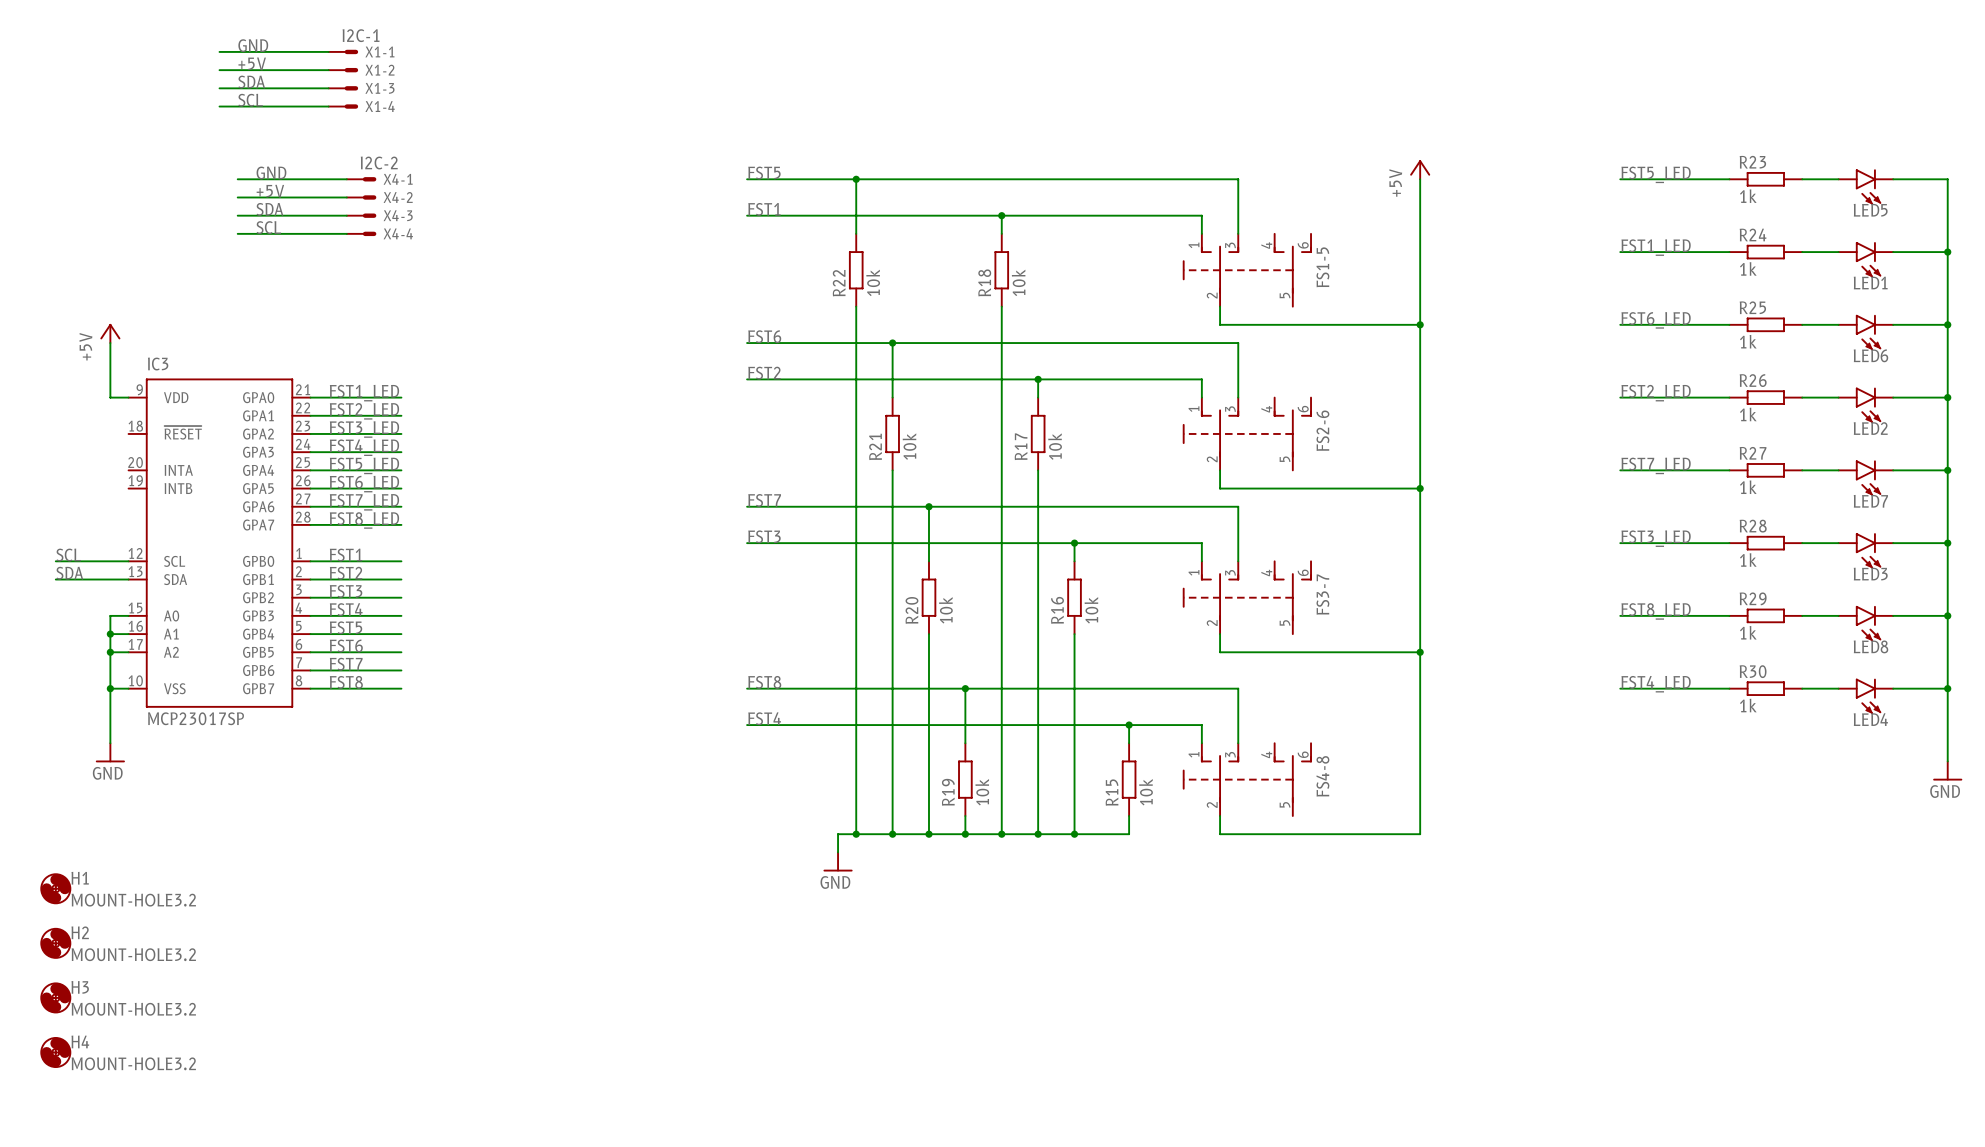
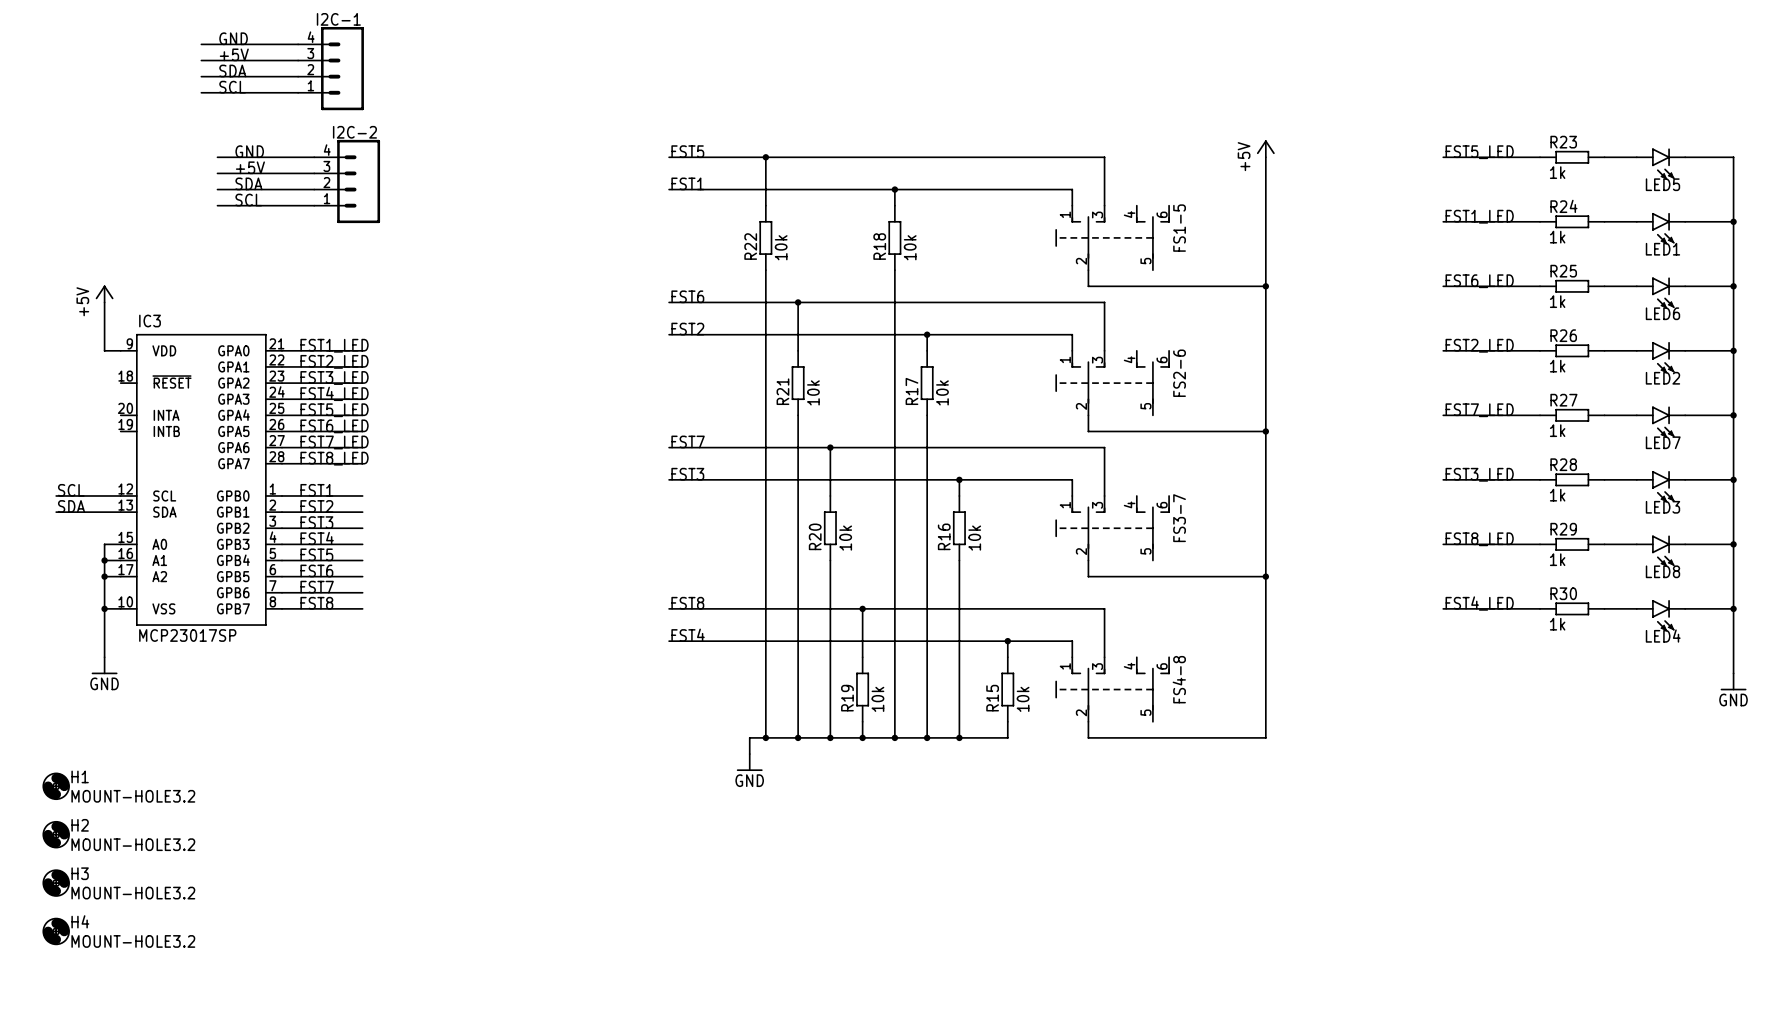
X1-1: I2C-1 (343, 51) -> none
X1-2: (343, 70) -> none
I2C-1: none -> (331, 68)
X1-3: (343, 88) -> none
X1-4: (343, 106) -> none
X4-1: I2C-2 (361, 179) -> none
X4-2: (361, 197) -> none
I2C-2: none -> (347, 181)
X4-3: (361, 215) -> none
X4-4: (361, 233) -> none

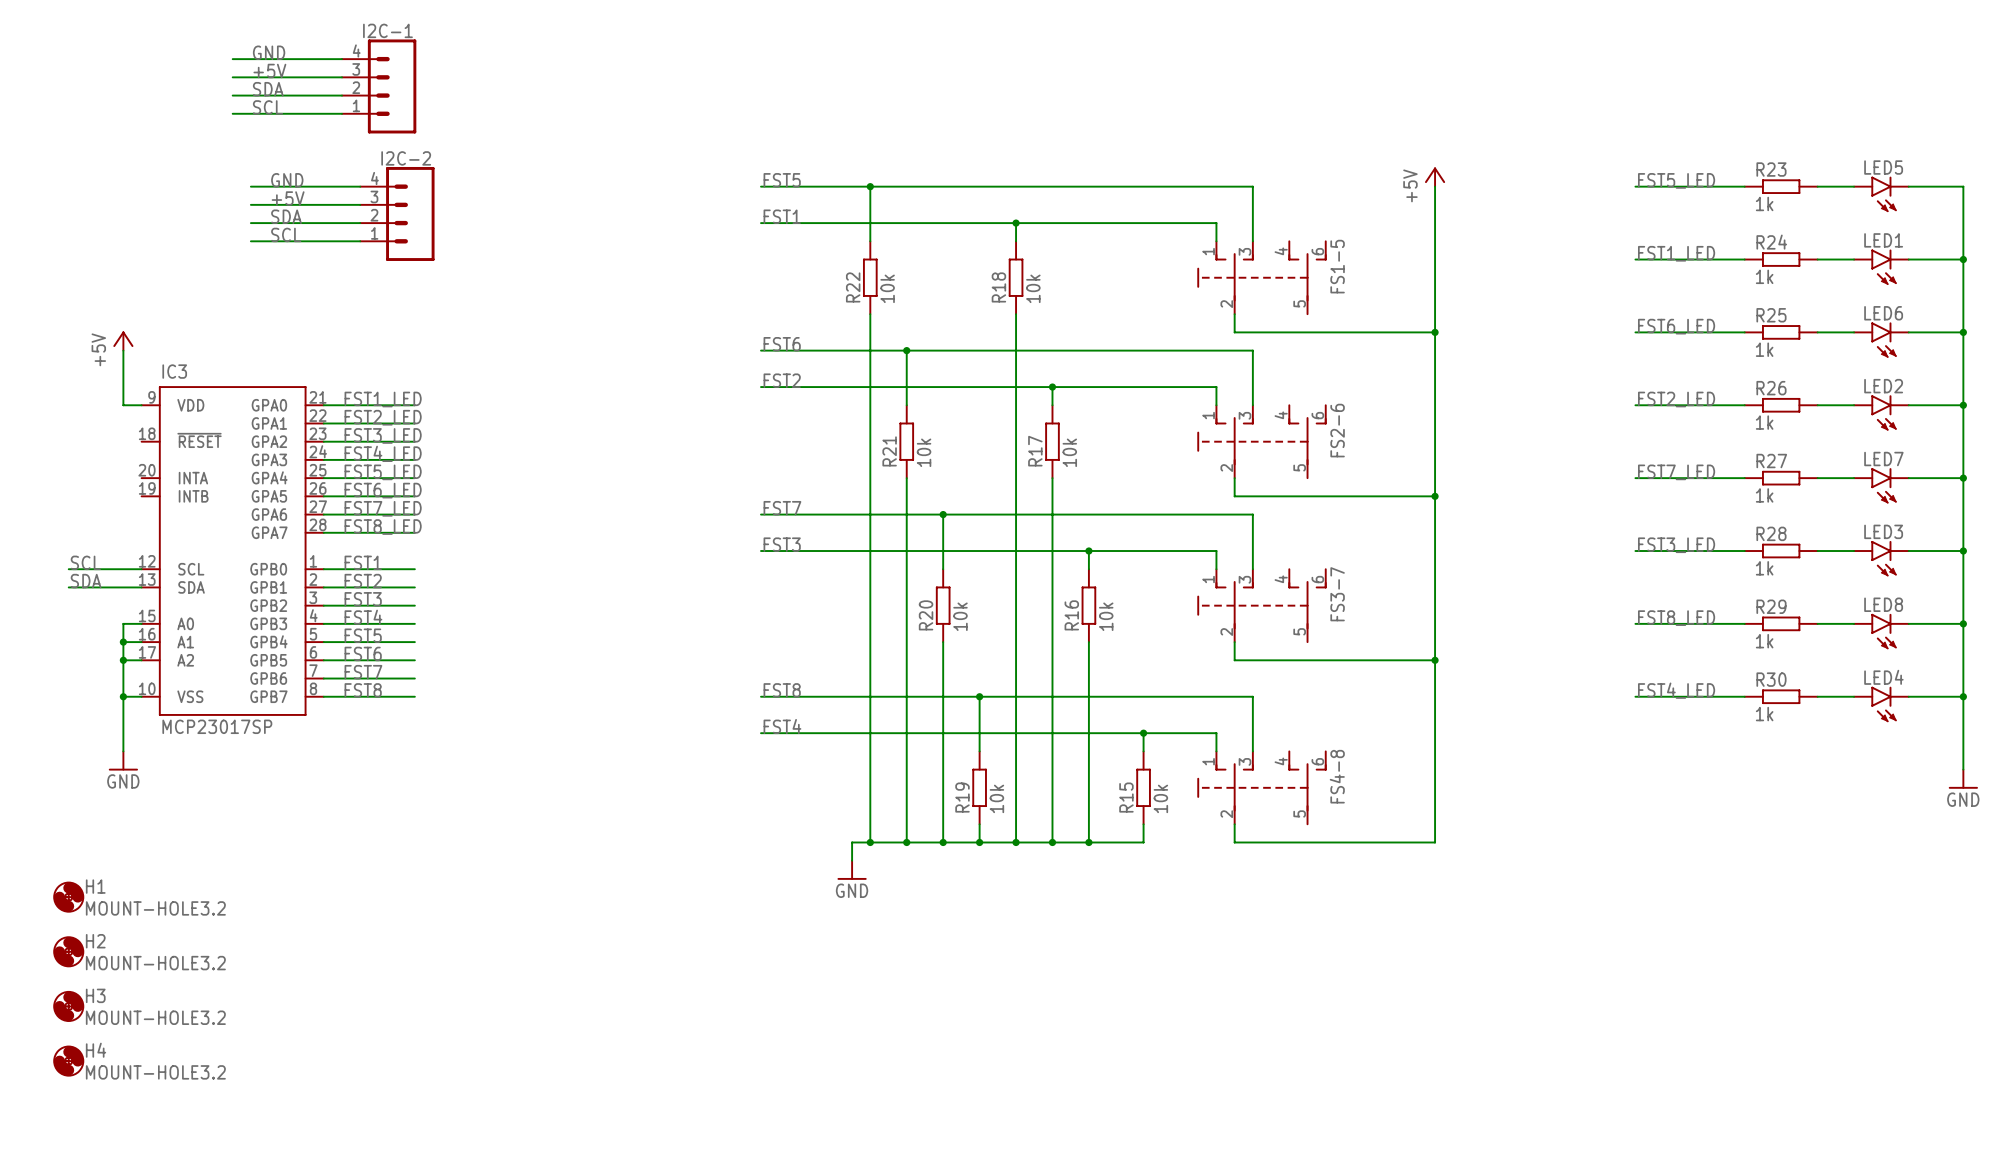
LED5 name position: LED5 (1662, 184) -> LED5 (1883, 167)
LED1 name position: LED1 (1662, 249) -> LED1 (1883, 240)
LED6 name position: LED6 (1662, 313) -> LED6 (1883, 313)
LED2 name position: LED2 (1662, 378) -> LED2 (1883, 386)
LED7 name position: LED7 (1663, 442) -> LED7 (1883, 459)
LED3 name position: LED3 (1662, 507) -> LED3 (1883, 531)
LED8 name position: LED8 (1662, 571) -> LED8 (1883, 604)
LED4 name position: LED4 (1663, 636) -> LED4 (1883, 677)

